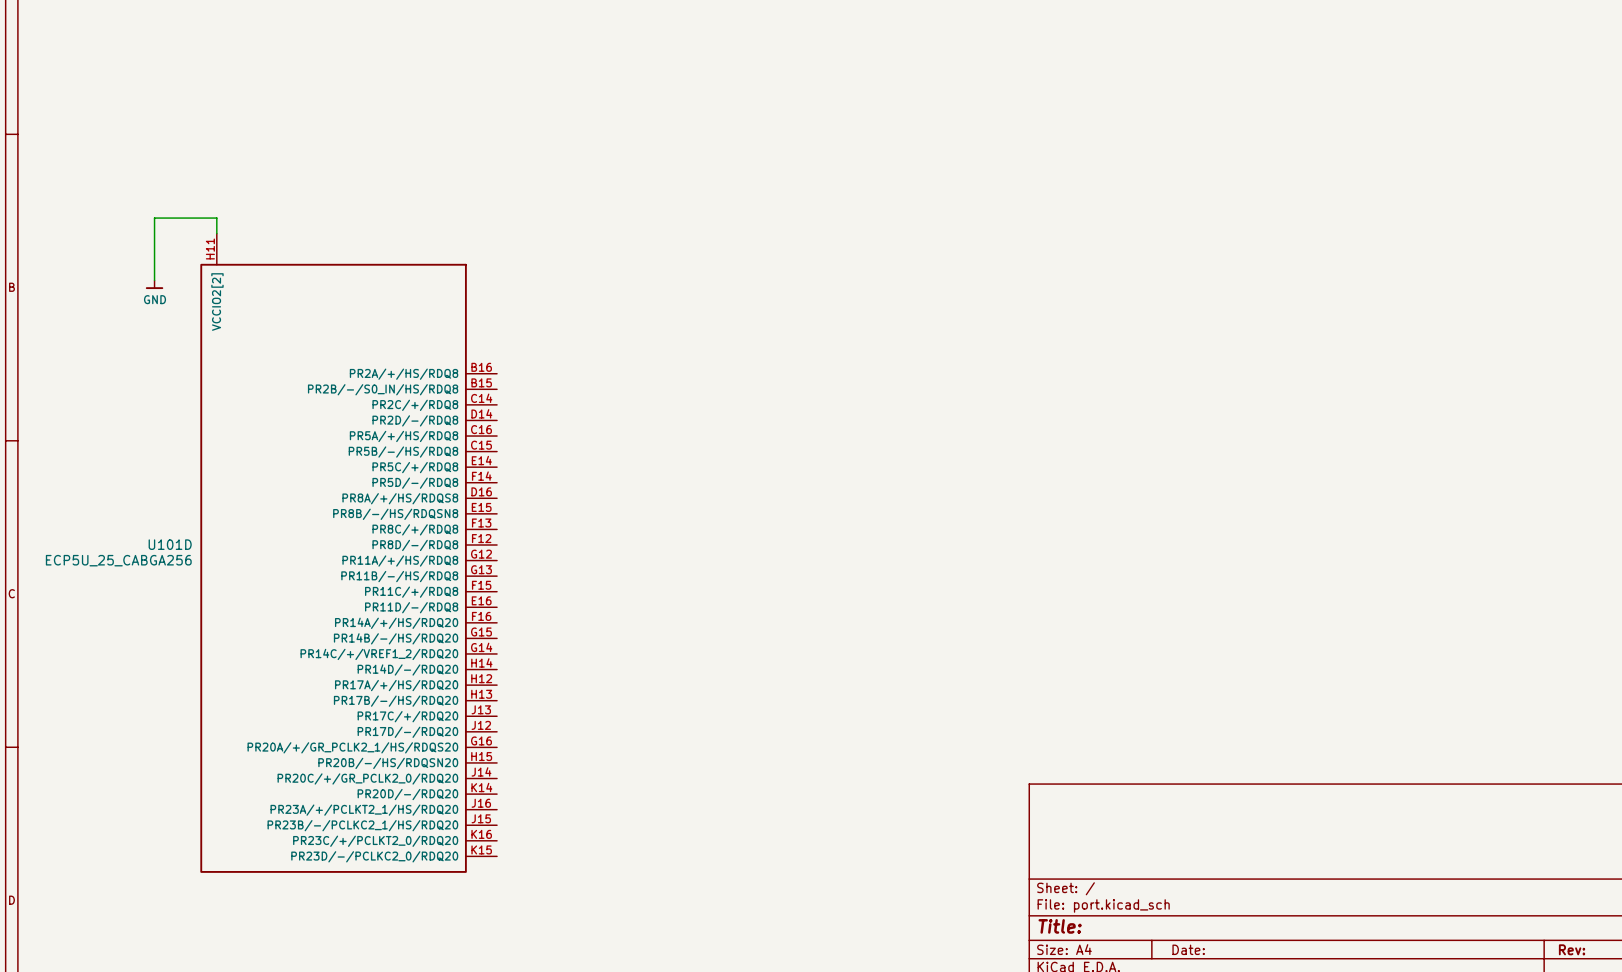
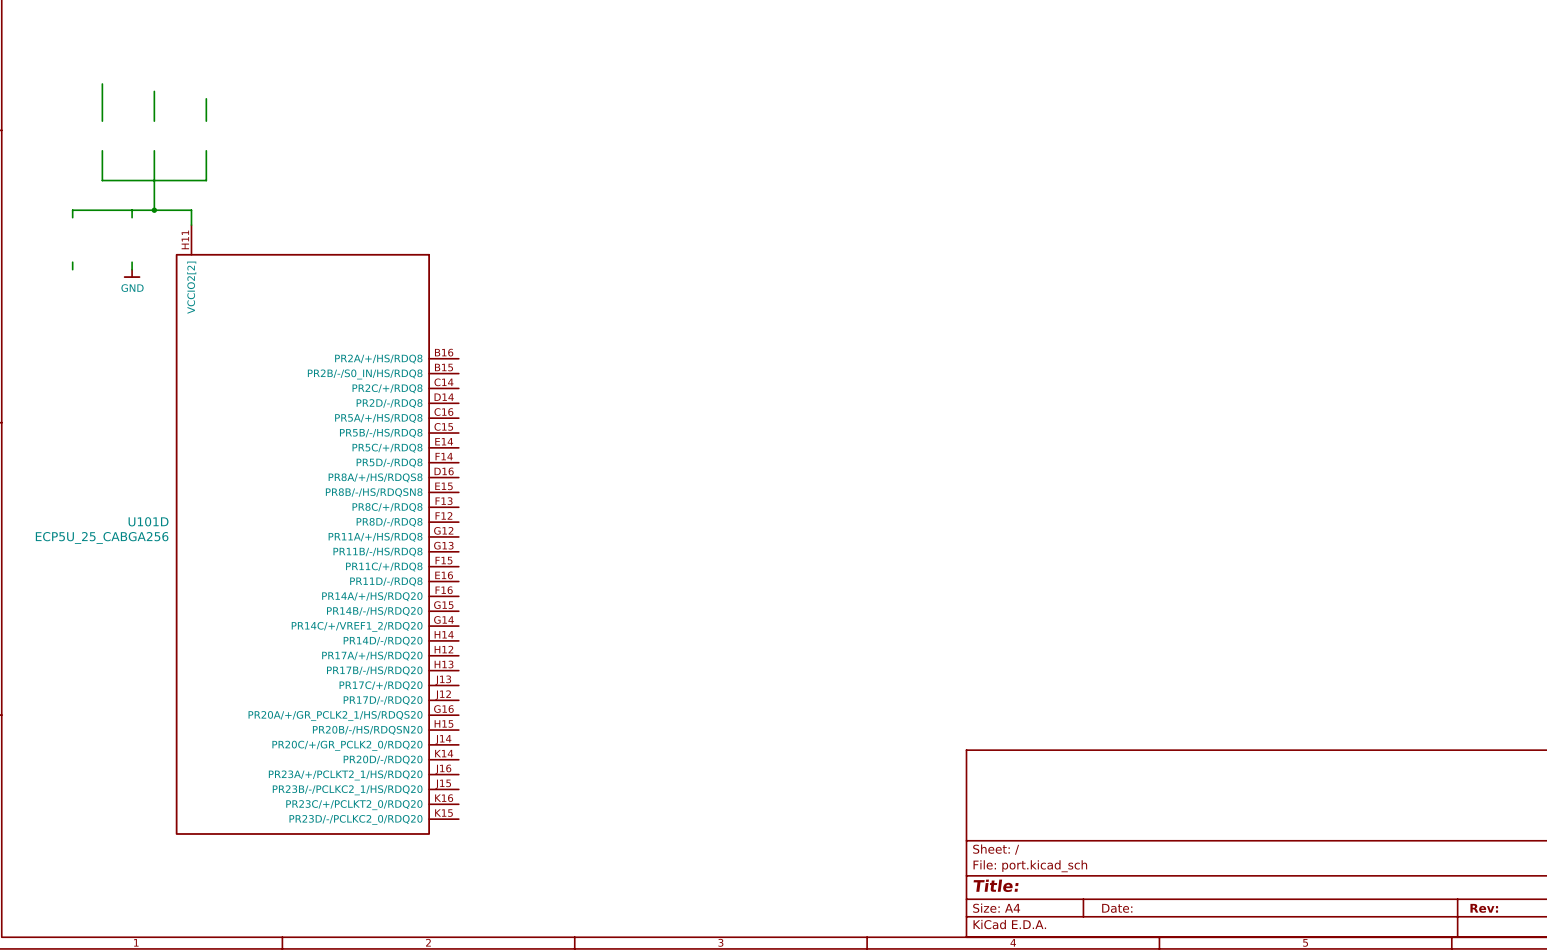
wire: none -> (102, 84) (102, 121)
wire: none -> (154, 91) (154, 121)
wire: none -> (206, 98) (206, 121)
wire: none -> (102, 150) (102, 180) (206, 180) (206, 150)
wire: none -> (154, 150) (154, 210)
wire: none -> (132, 210) (72, 210) (72, 217)
junction: none -> (154, 210)
wire: (154, 225) (154, 272) -> none
wire: none -> (72, 262) (72, 269)

